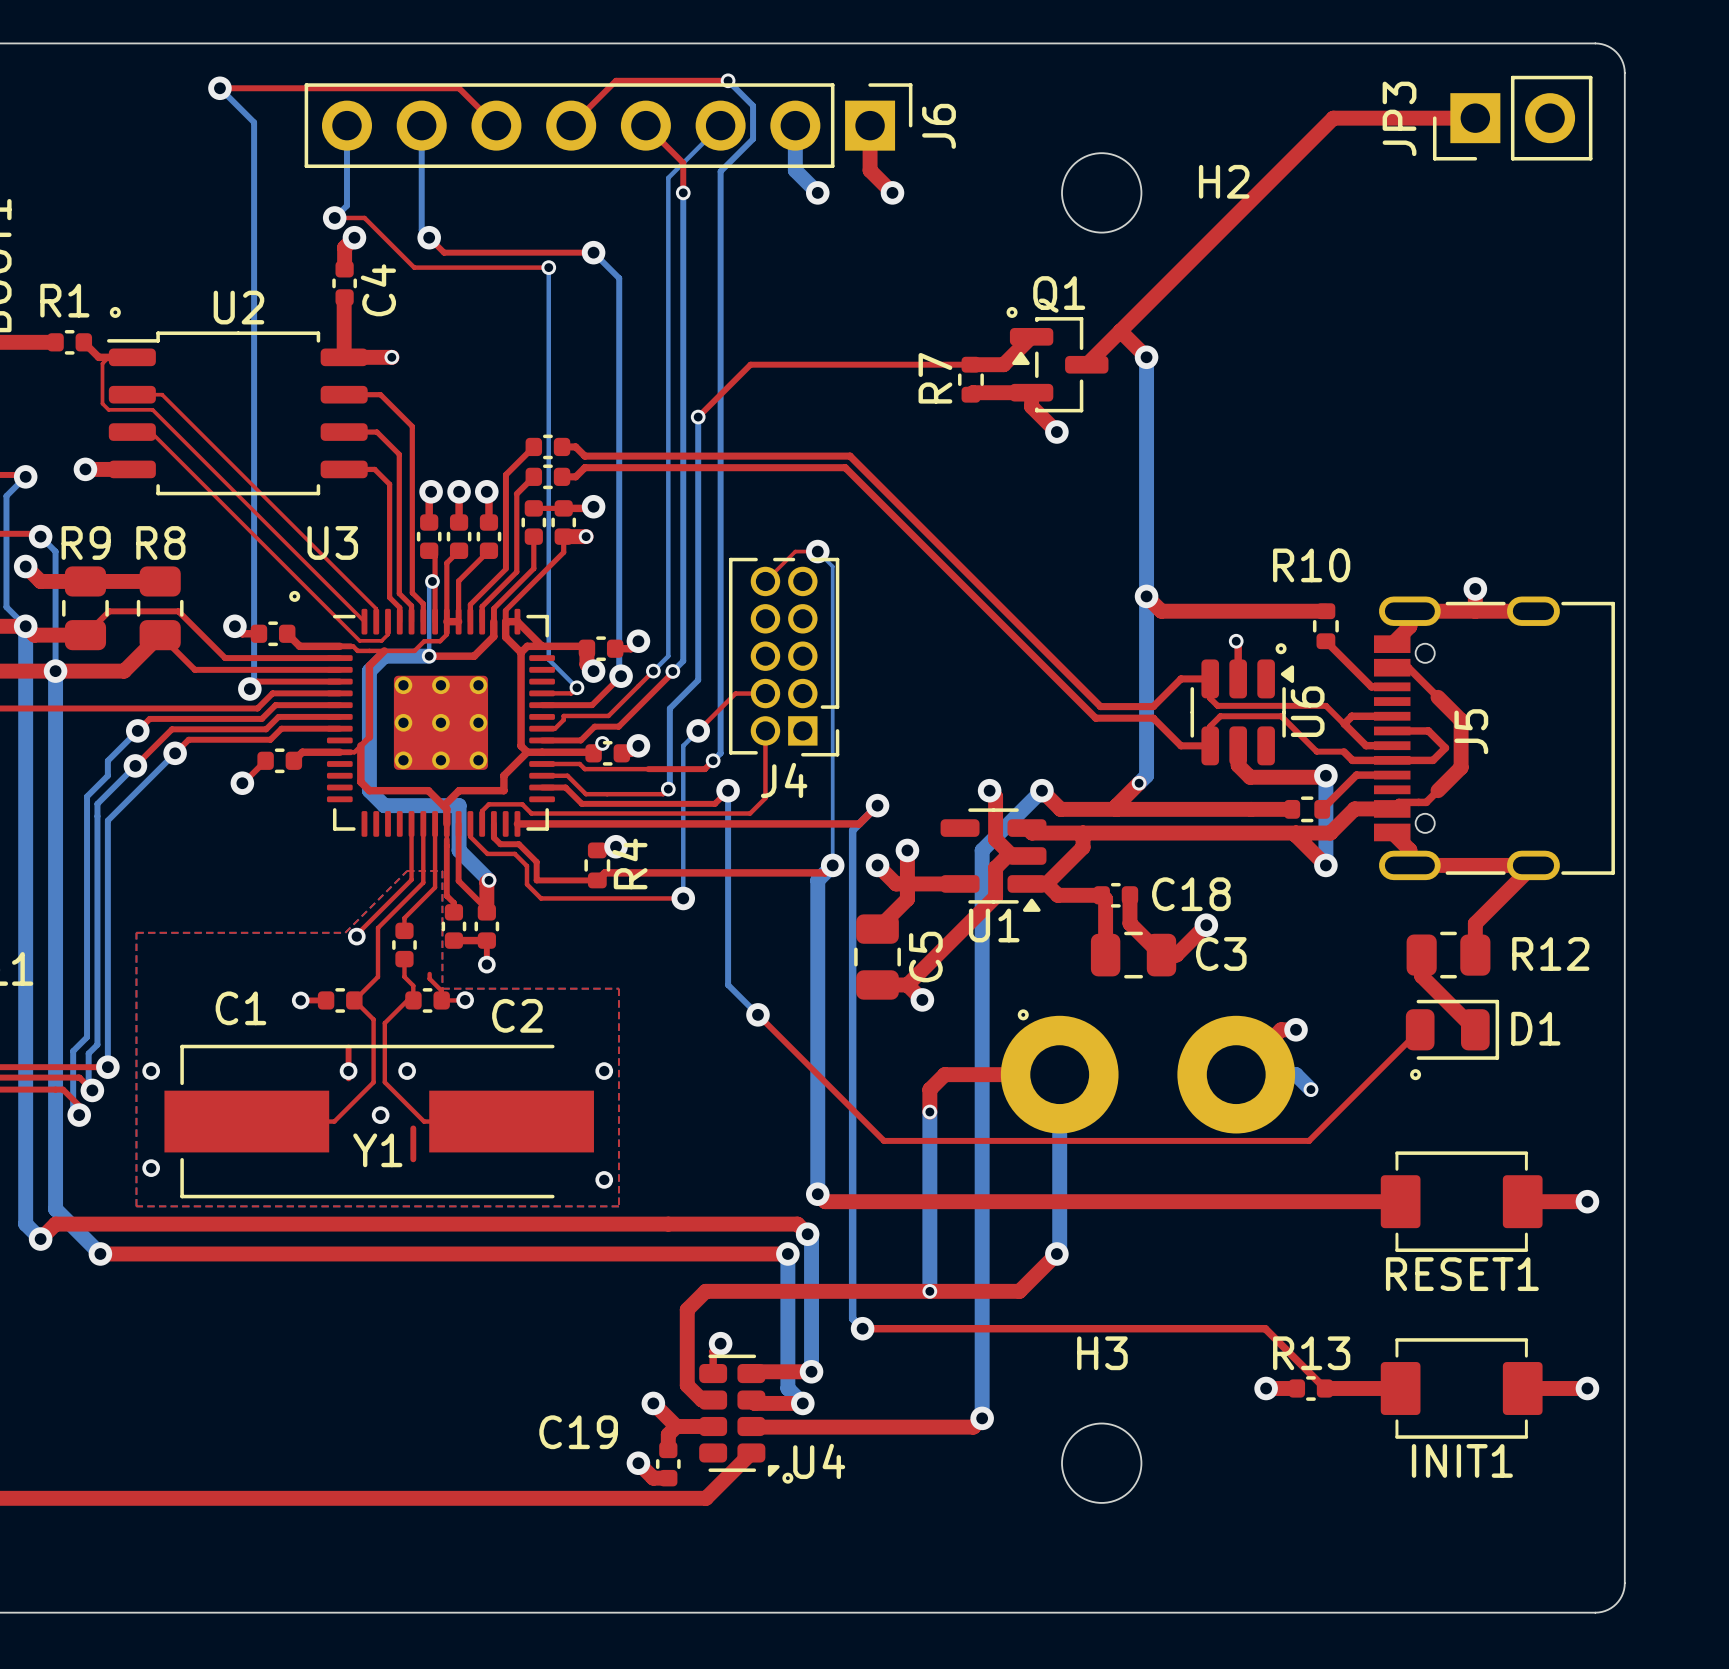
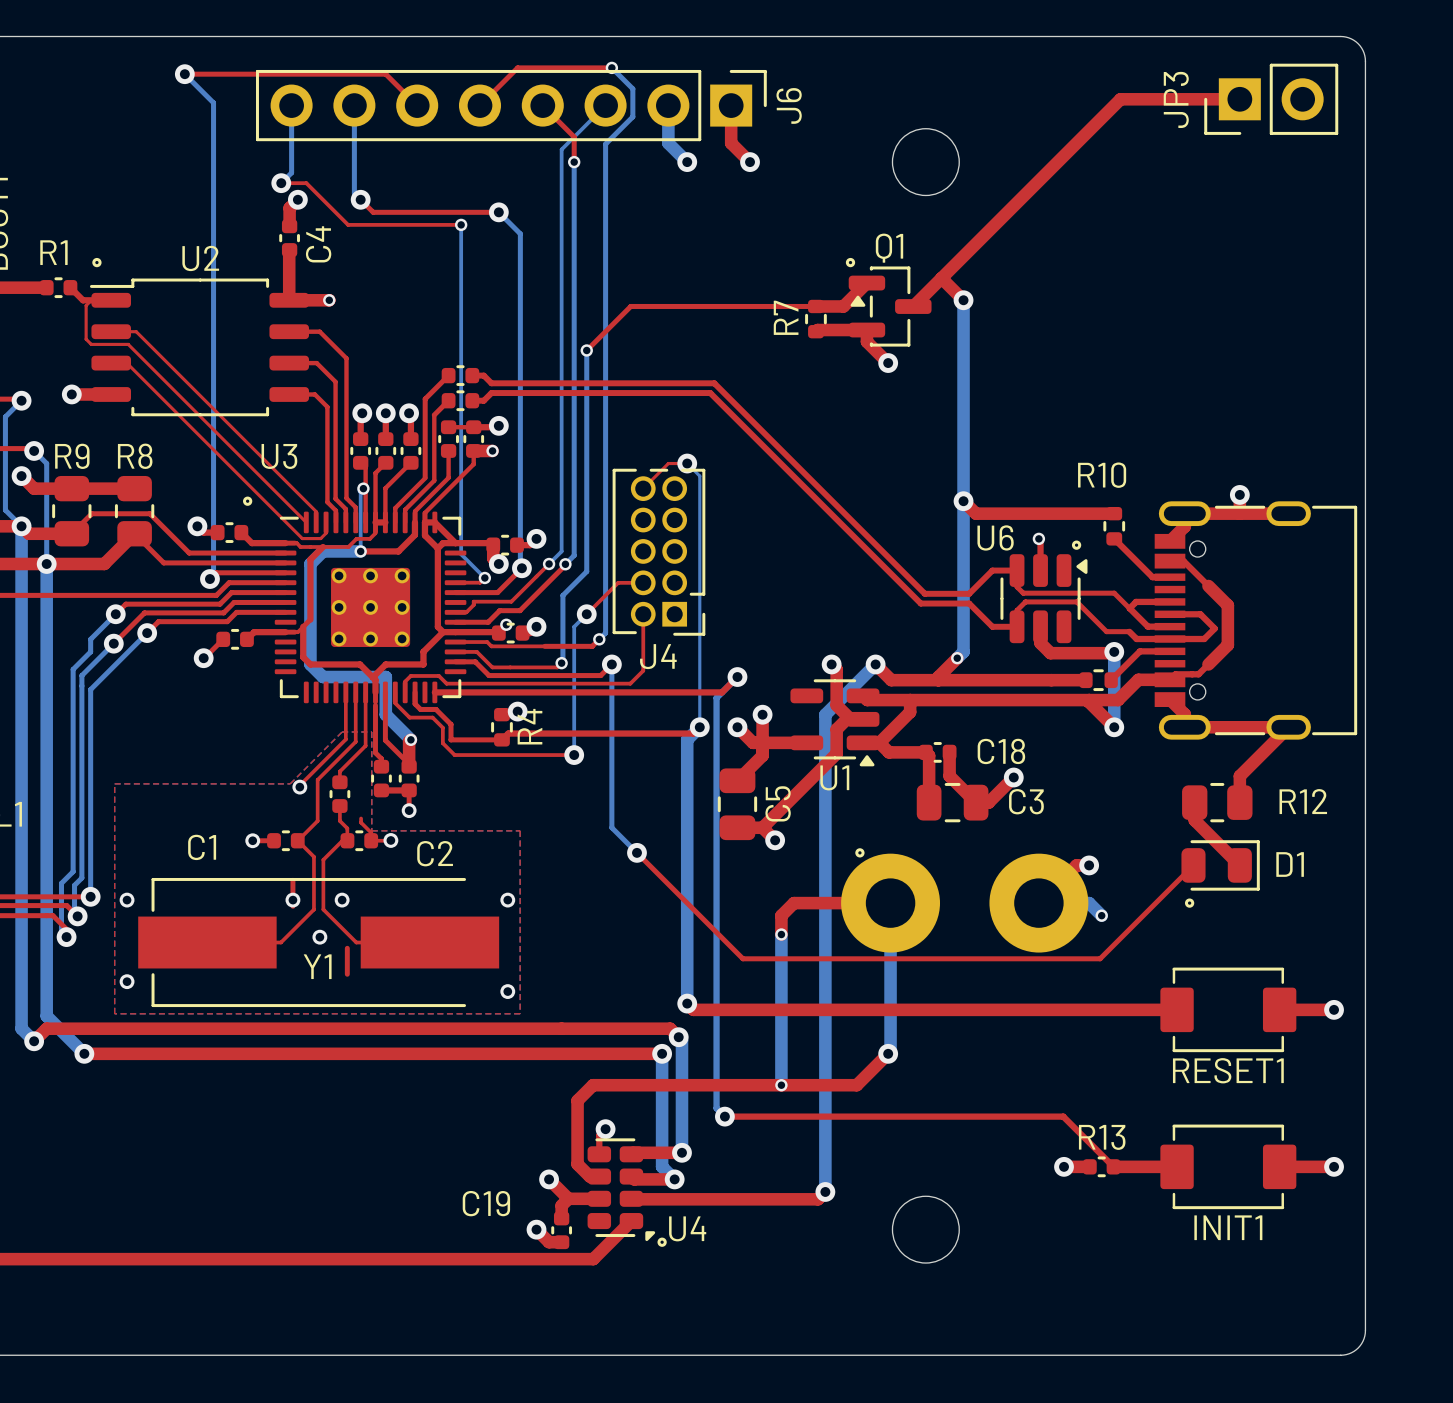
H2 name: H2 (1224, 181) -> none
U6 name rotation: 0° (1307, 711) -> 90° clockwise (995, 537)
U6 name position: U6 (1307, 711) -> U6 (995, 537)
J5 name: J5 (1471, 731) -> none
H3 name: H3 (1102, 1353) -> none

